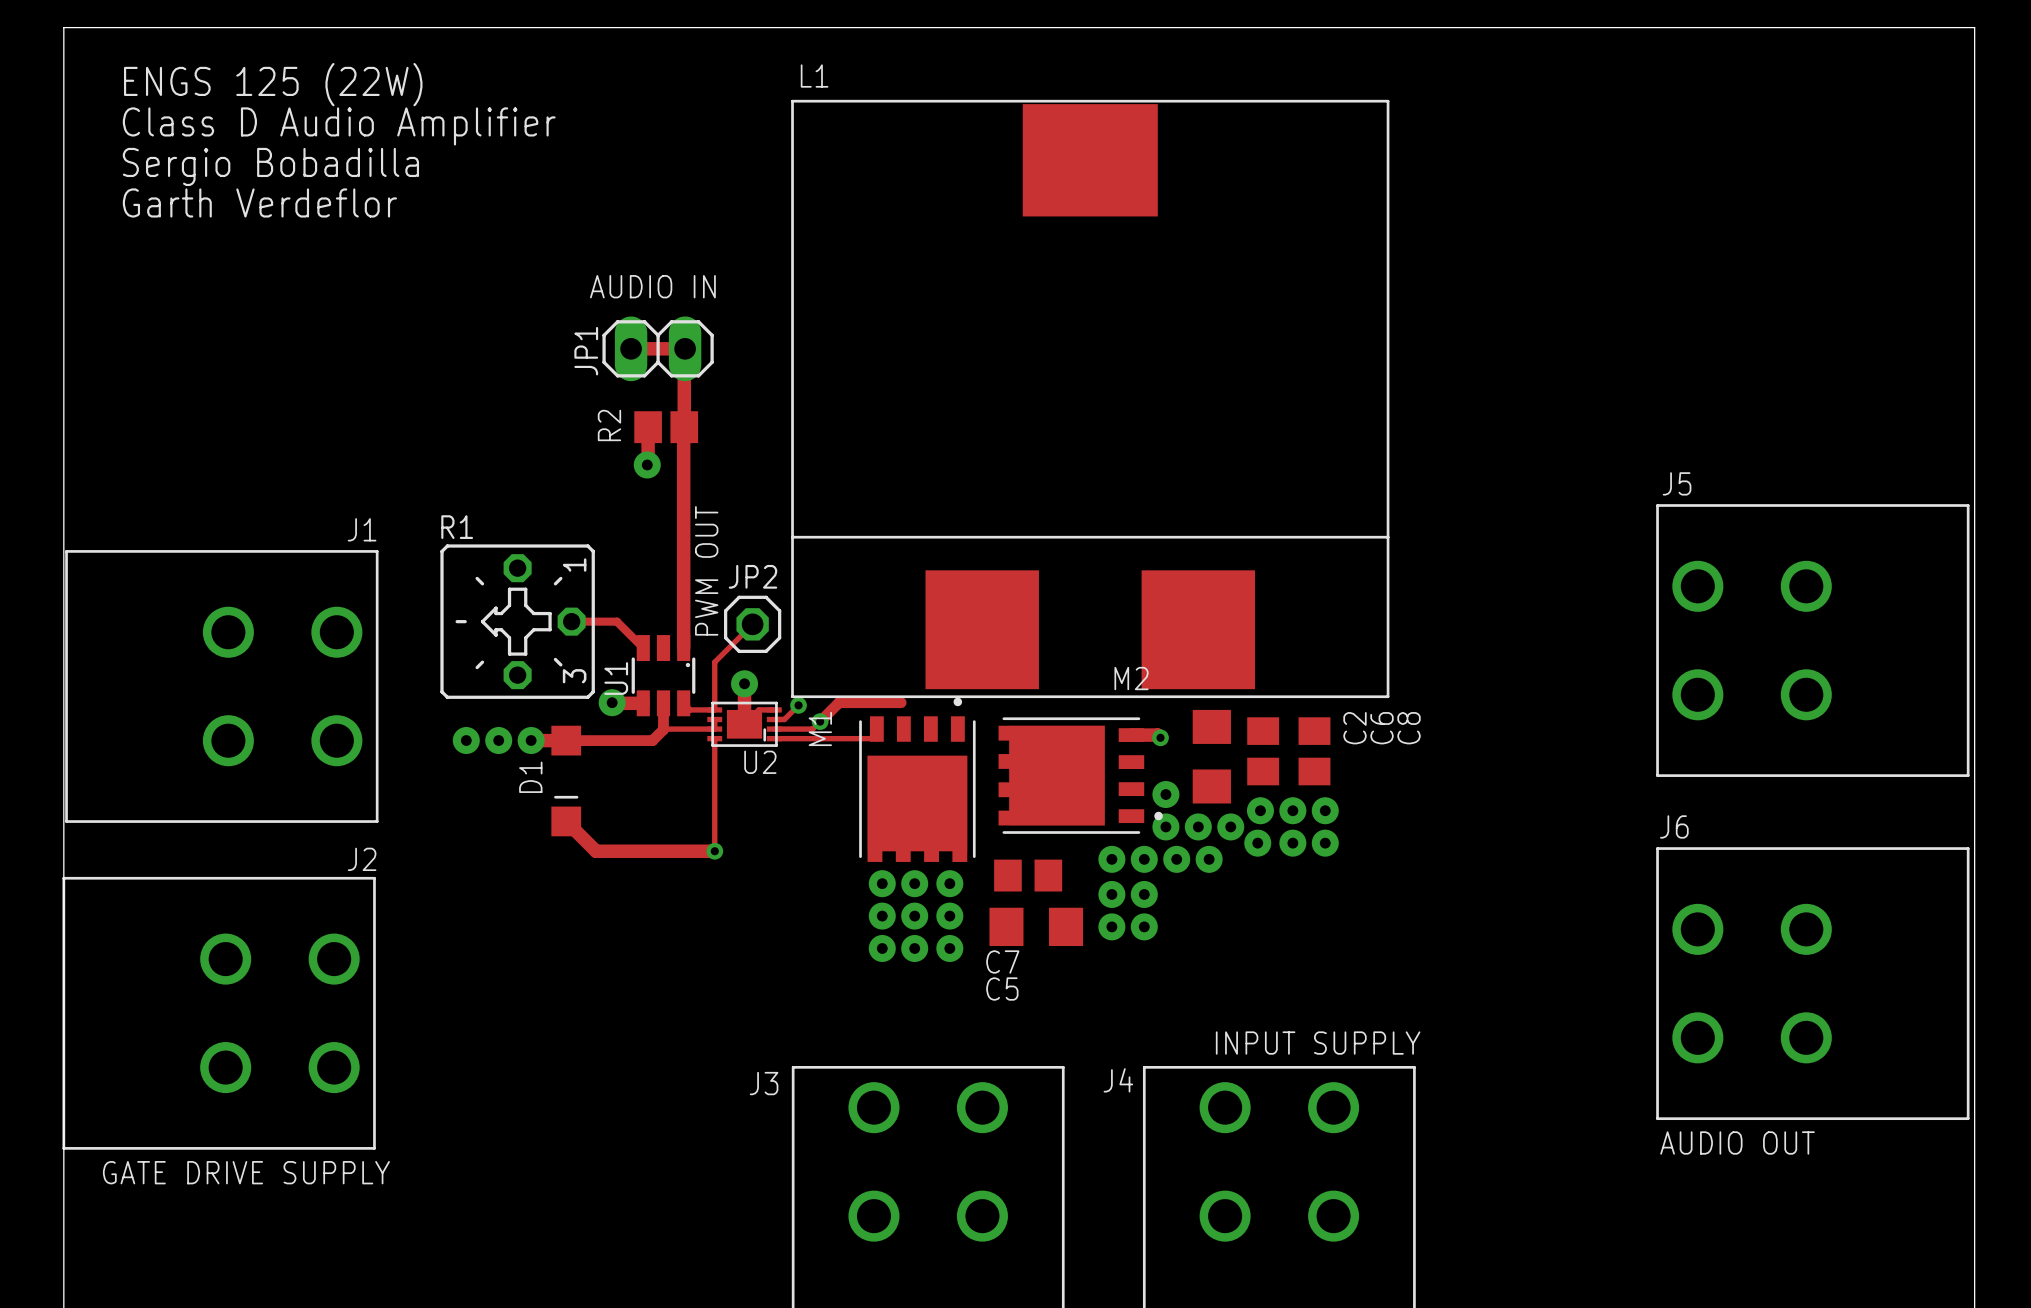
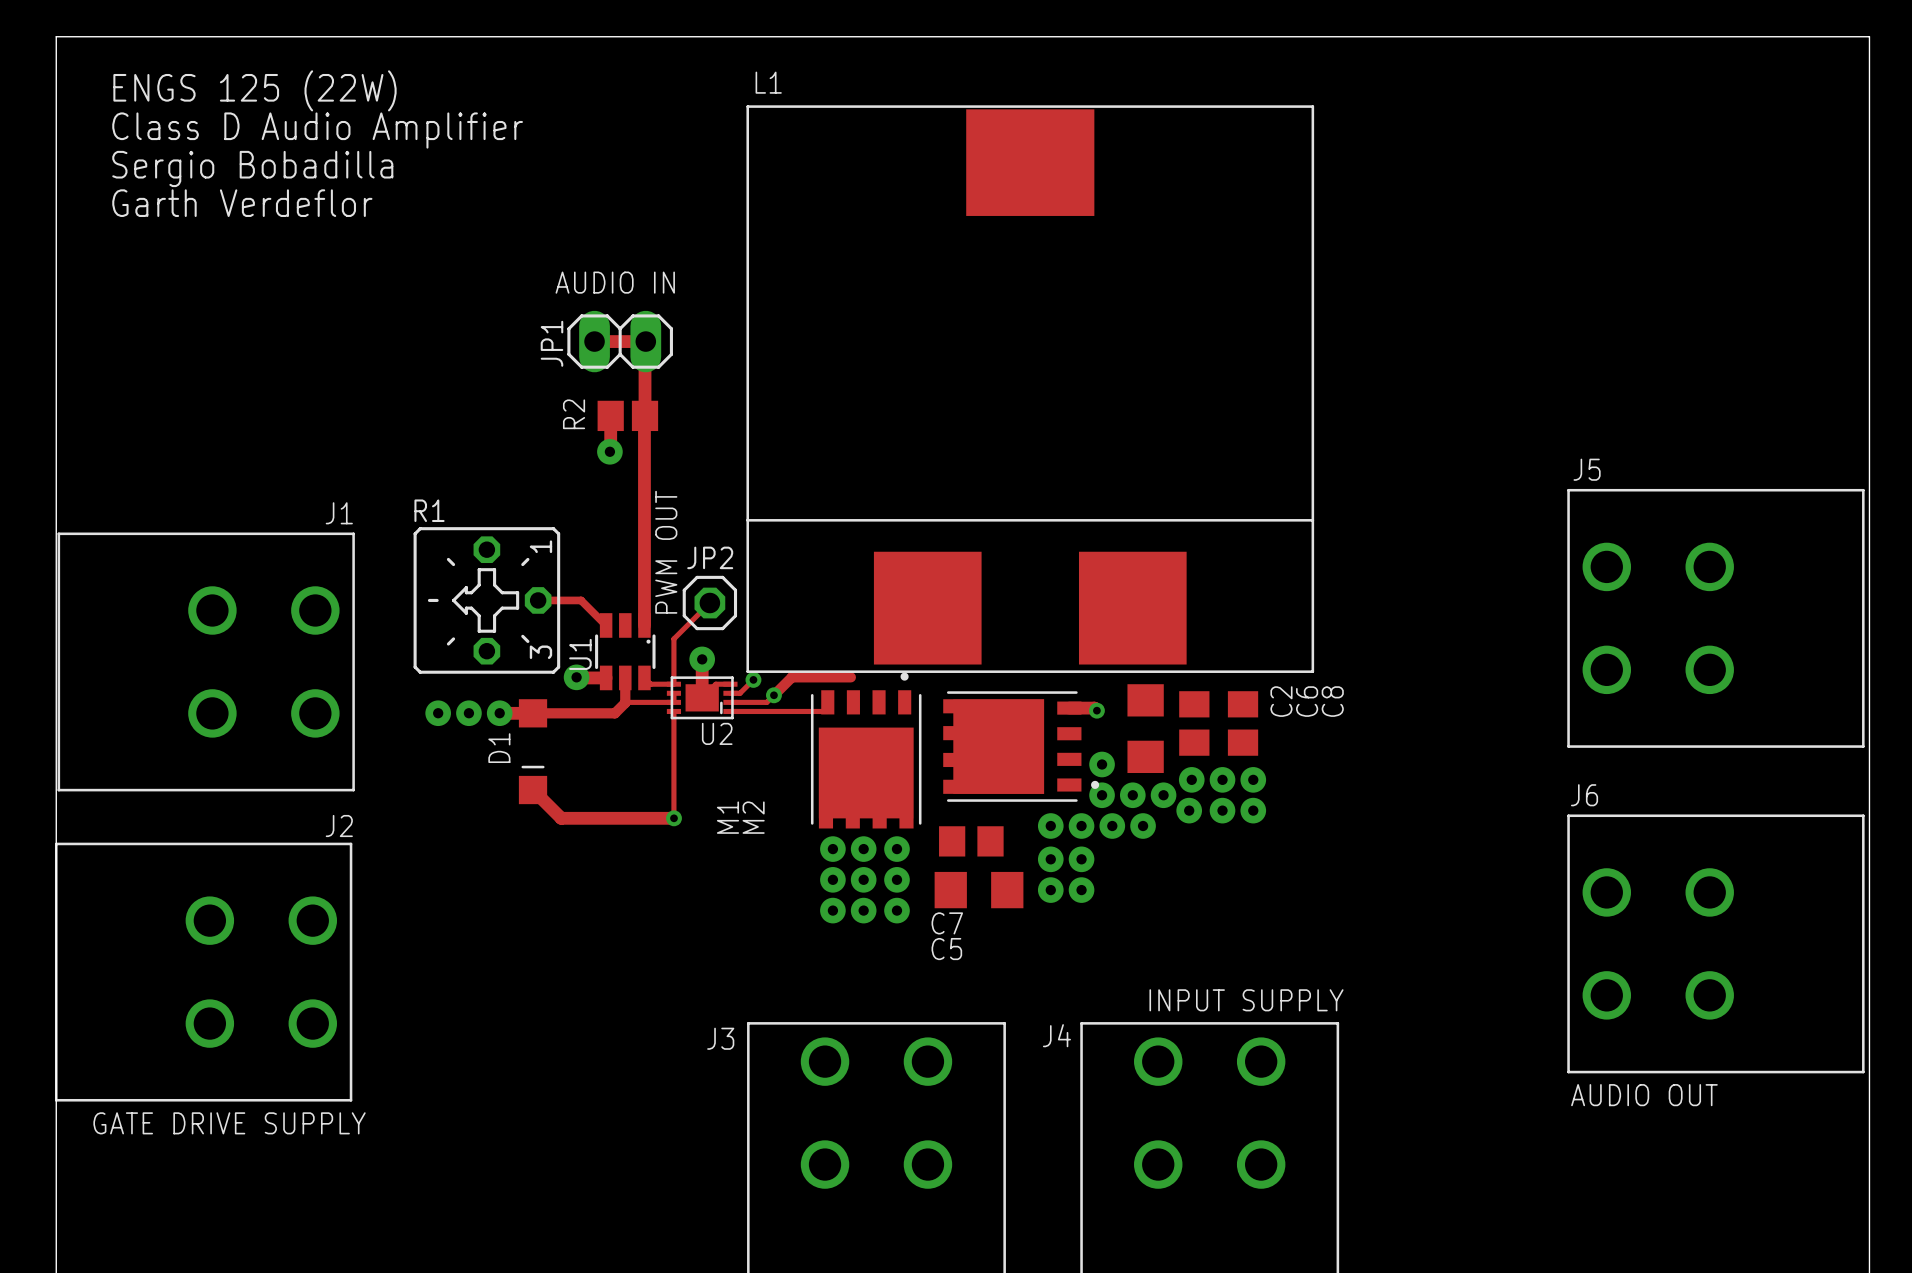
M2 name rotation: 0° (1131, 678) -> 90° counterclockwise (753, 817)
M2 name position: M2 (1131, 678) -> M2 (753, 817)
M1 name position: M1 (820, 728) -> M1 (727, 817)

